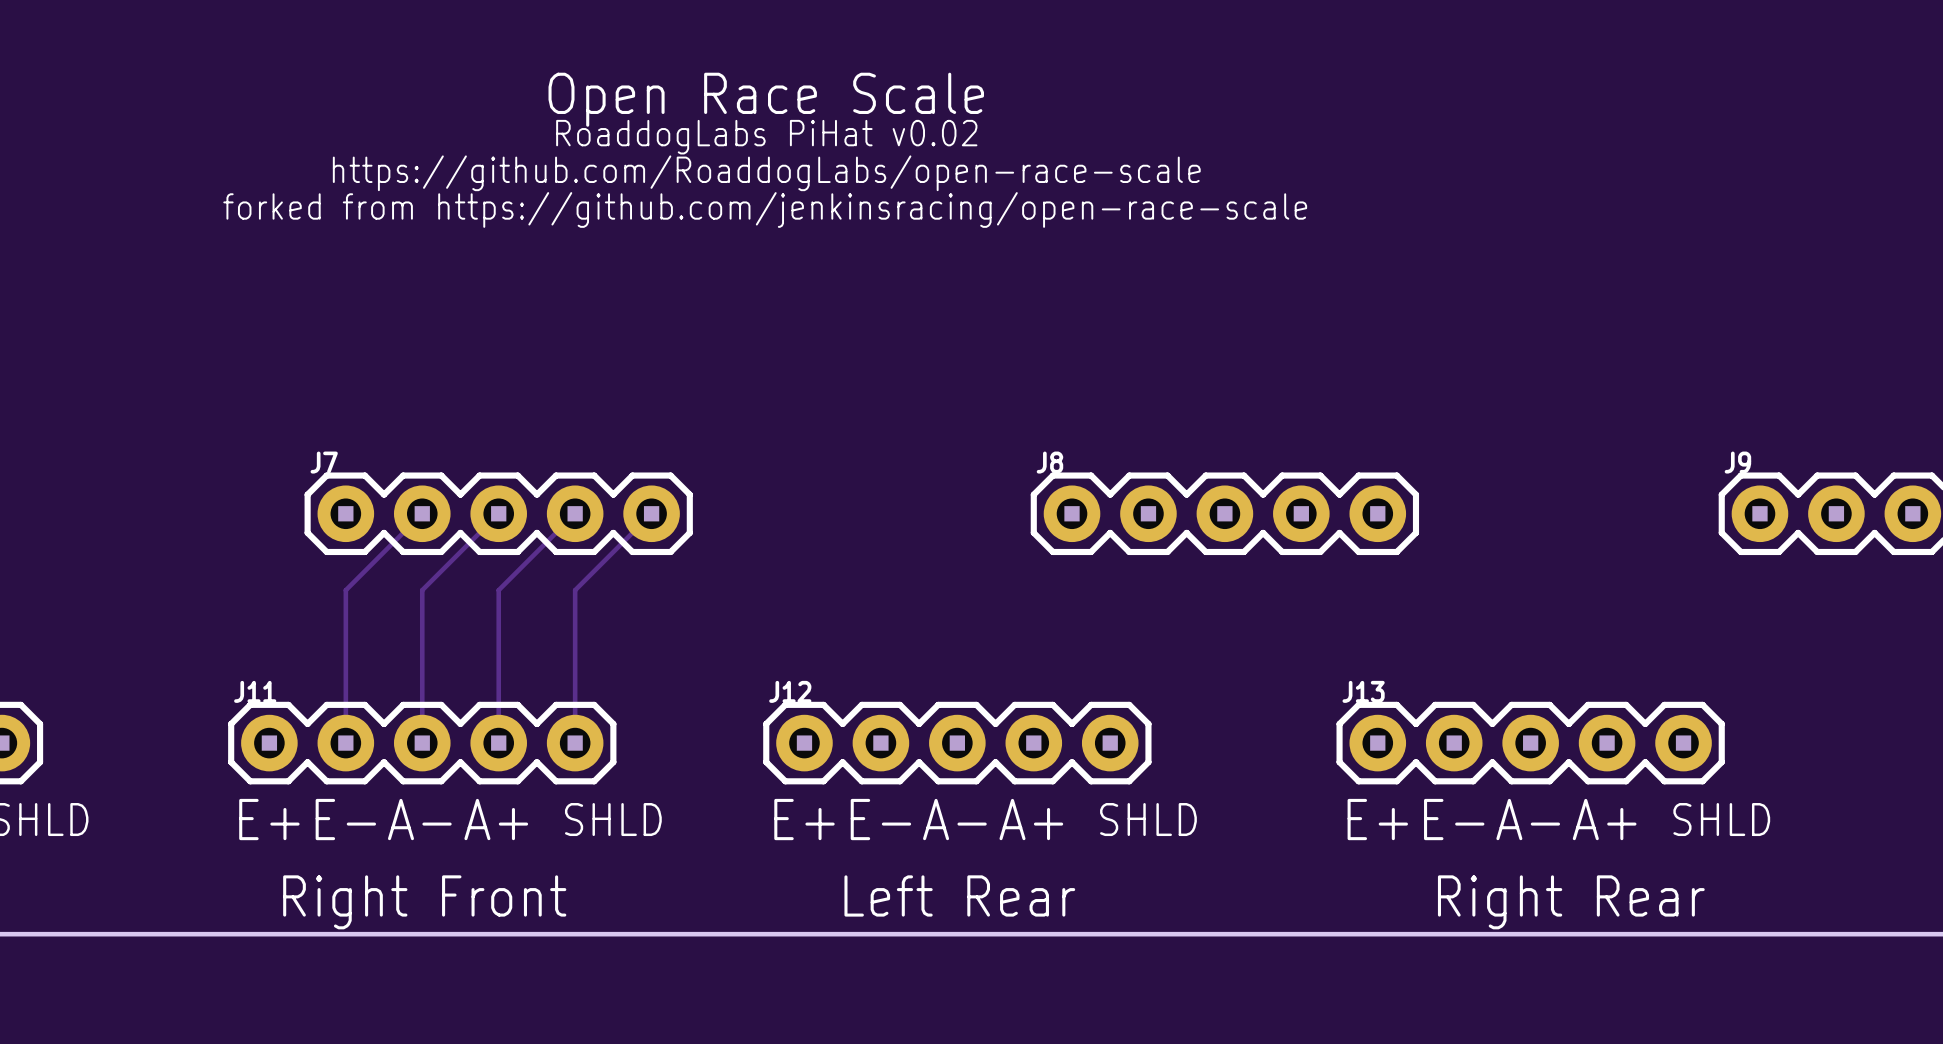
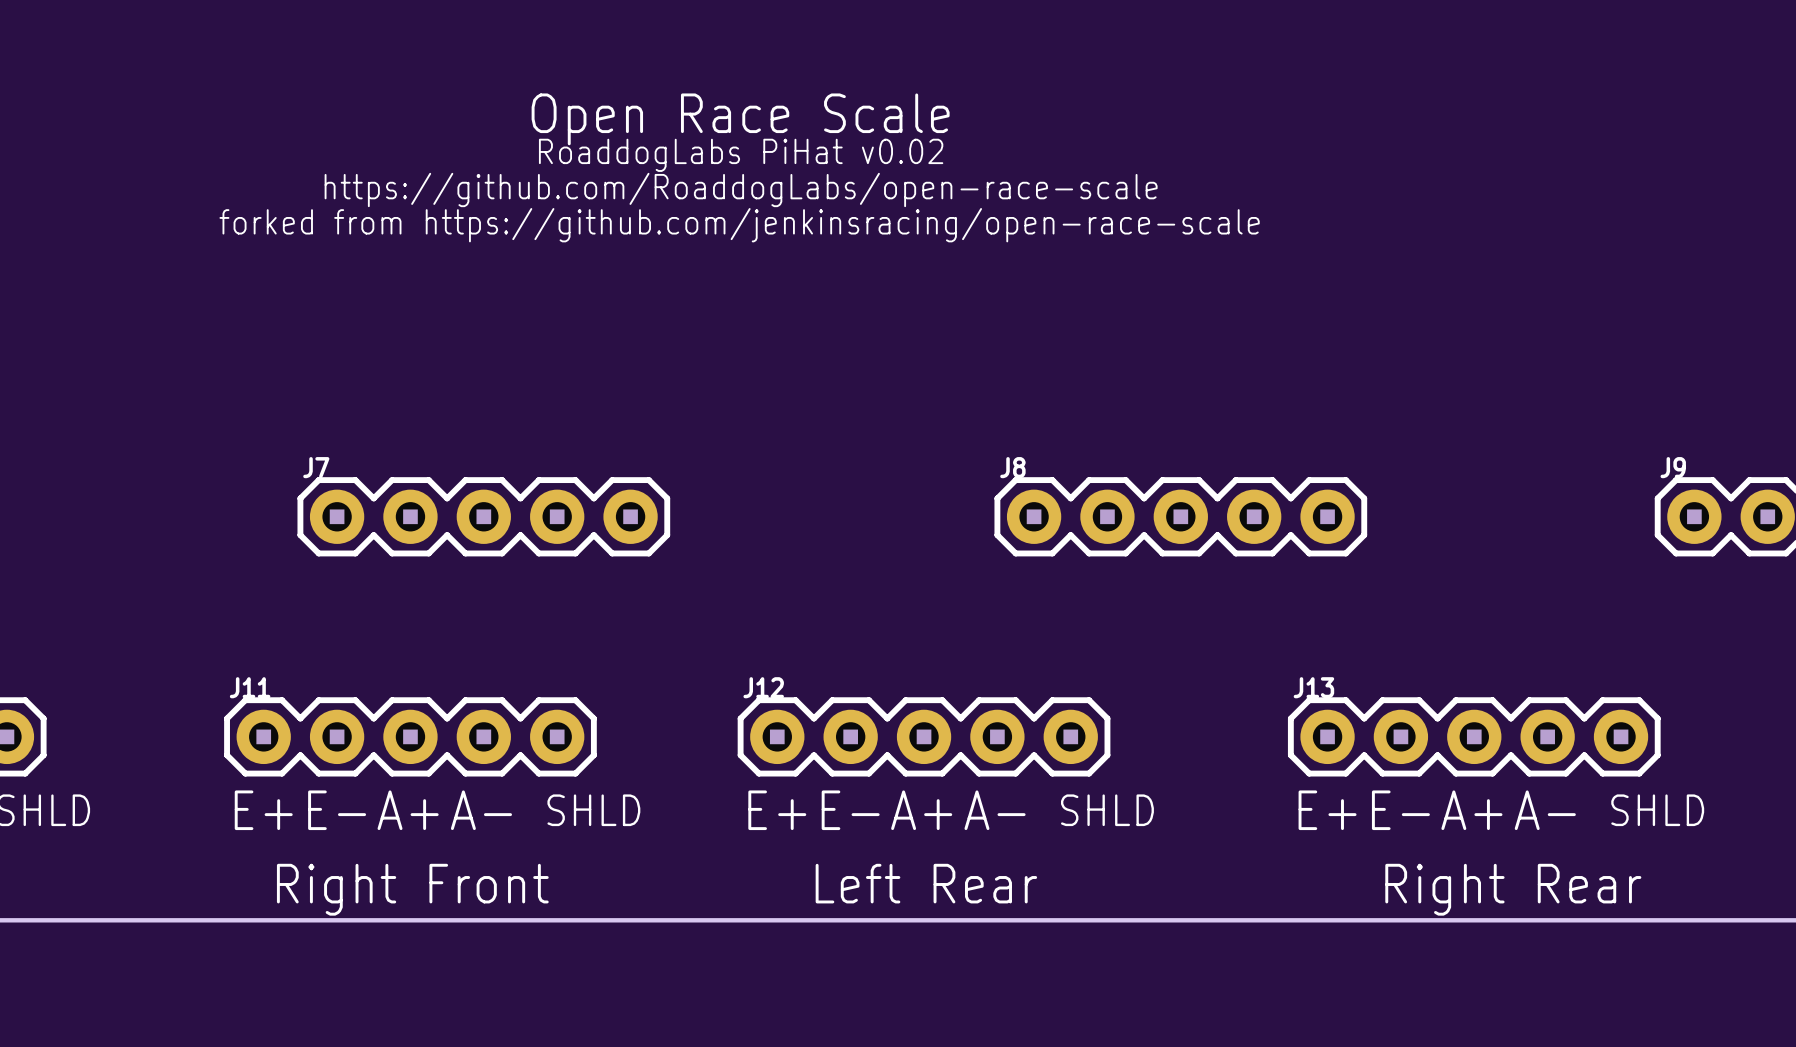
track: (422, 513) (345, 590) (345, 743) -> none
track: (498, 513) (422, 590) (422, 743) -> none
track: (575, 513) (498, 590) (498, 743) -> none
track: (651, 513) (575, 590) (575, 743) -> none
text: A- (419, 819) -> A+ (408, 810)
text: A+ (496, 819) -> A- (481, 810)
text: A- (954, 819) -> A+ (921, 810)
text: A+ (1031, 819) -> A- (995, 810)
text: A- (1528, 819) -> A+ (1471, 810)
text: A+ (1604, 819) -> A- (1545, 810)

